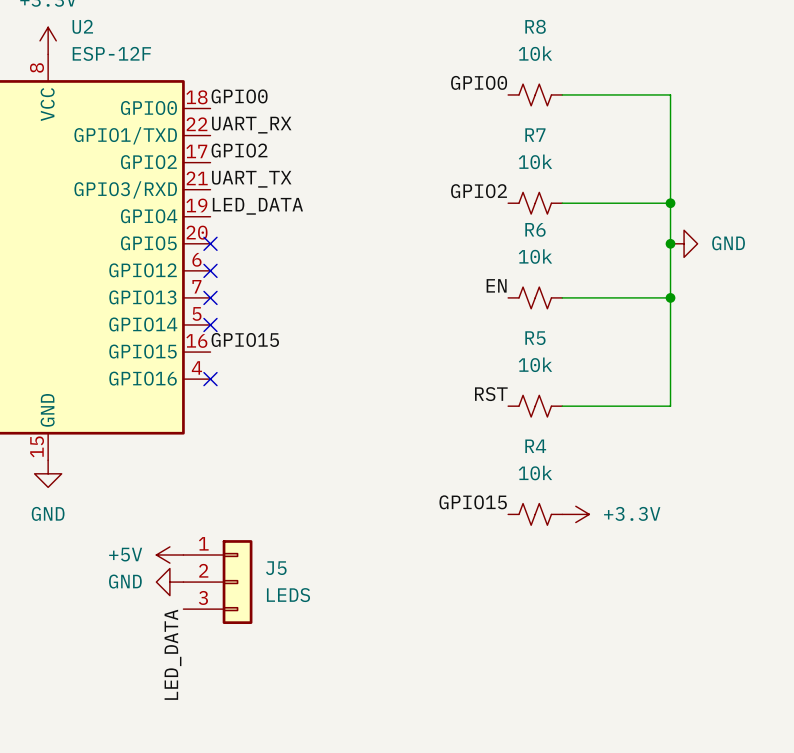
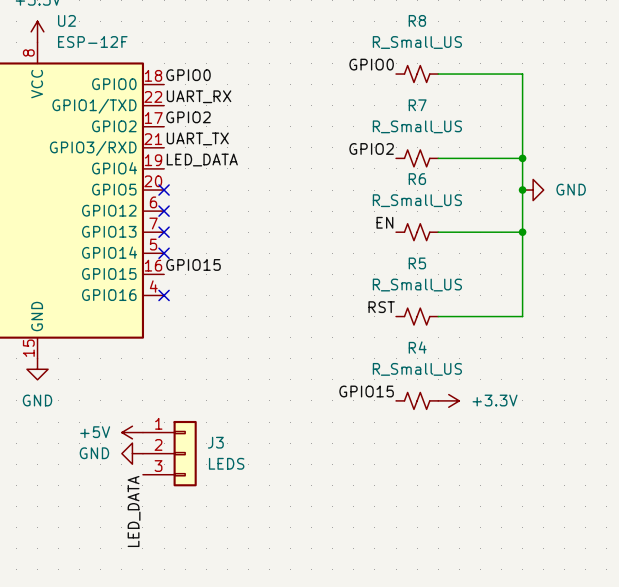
R8 value: 10k (535, 53) -> R_Small_US (417, 42)
R7 value: 10k (535, 161) -> R_Small_US (417, 126)
R6 value: 10k (535, 256) -> R_Small_US (417, 200)
R5 value: 10k (535, 364) -> R_Small_US (417, 285)
R4 value: 10k (535, 473) -> R_Small_US (417, 369)
J5 name: J5 (276, 568) -> J3 (215, 442)

